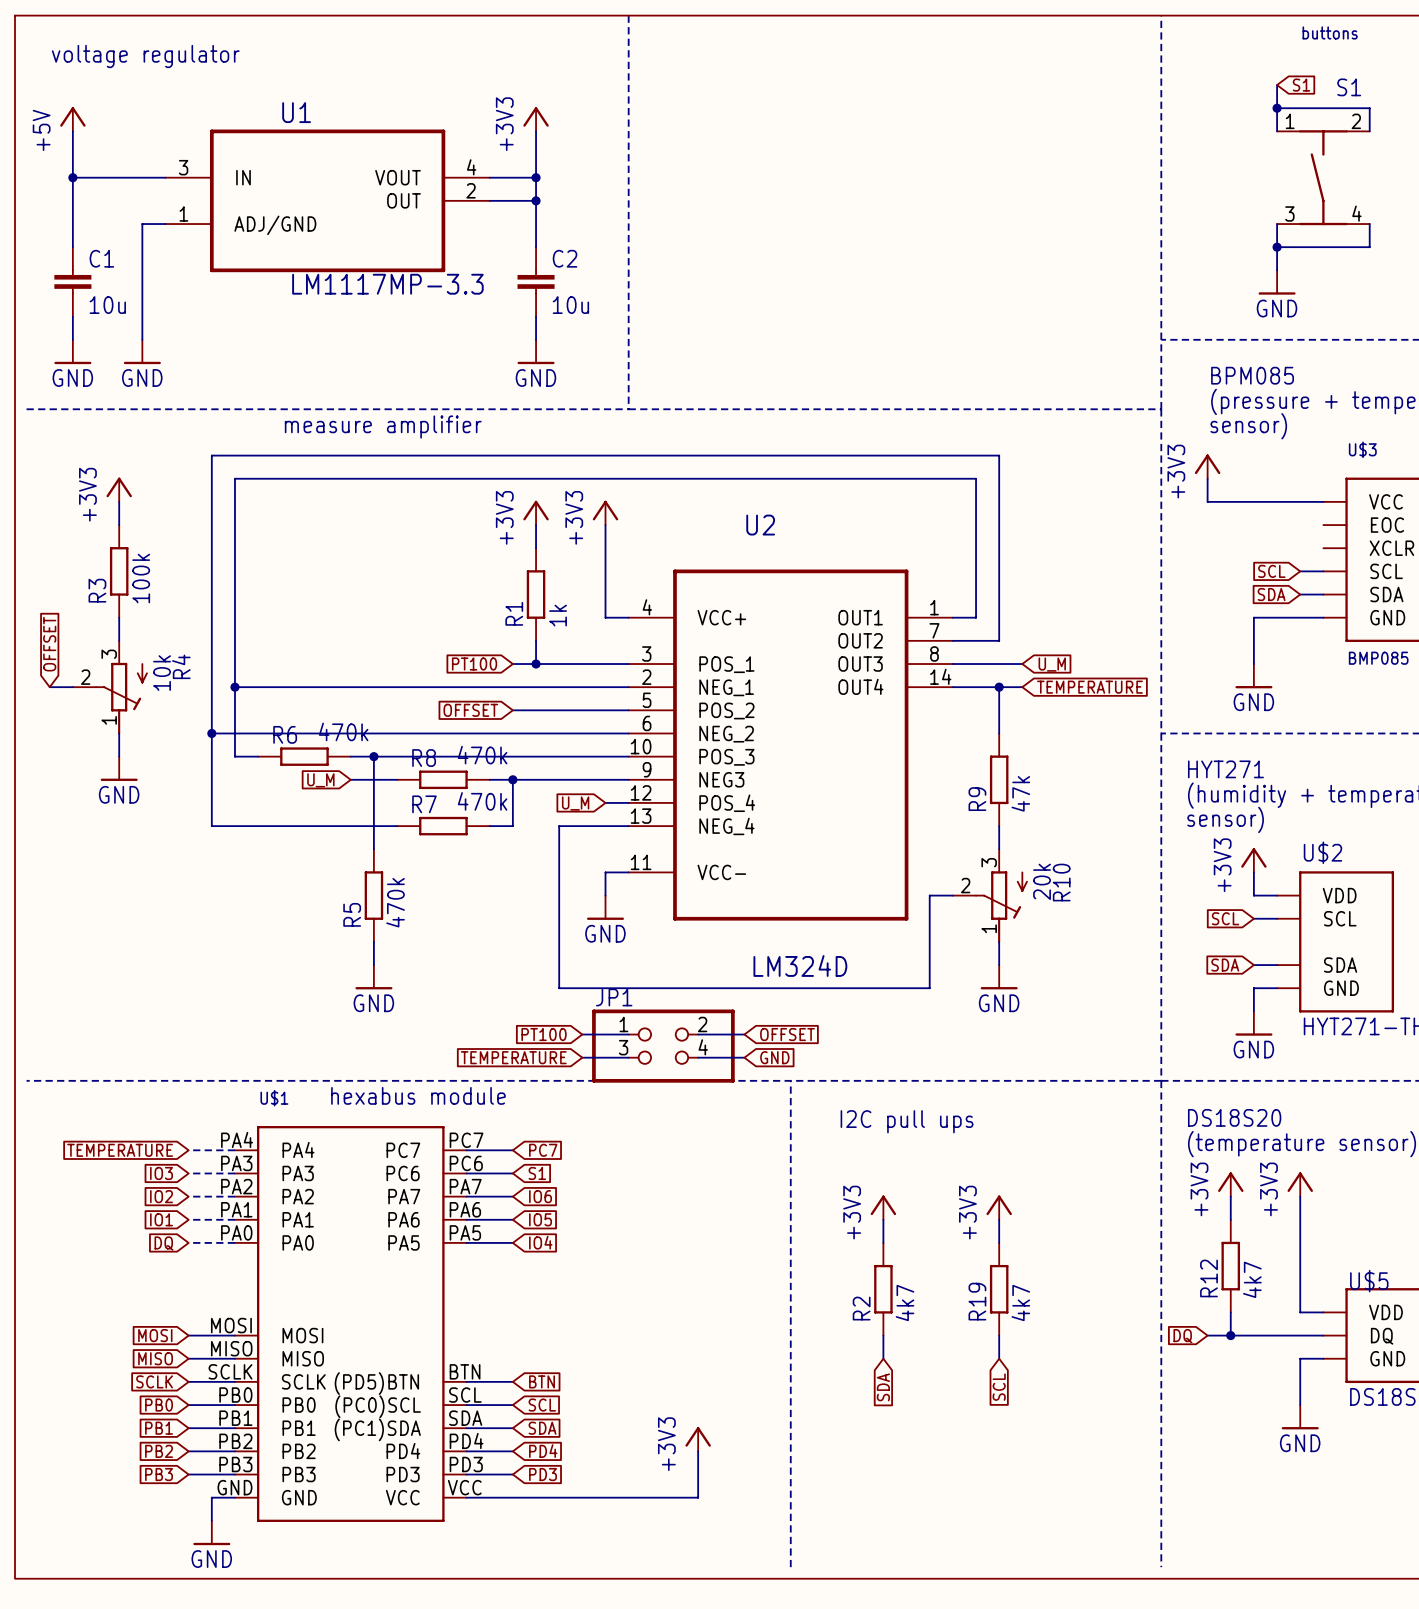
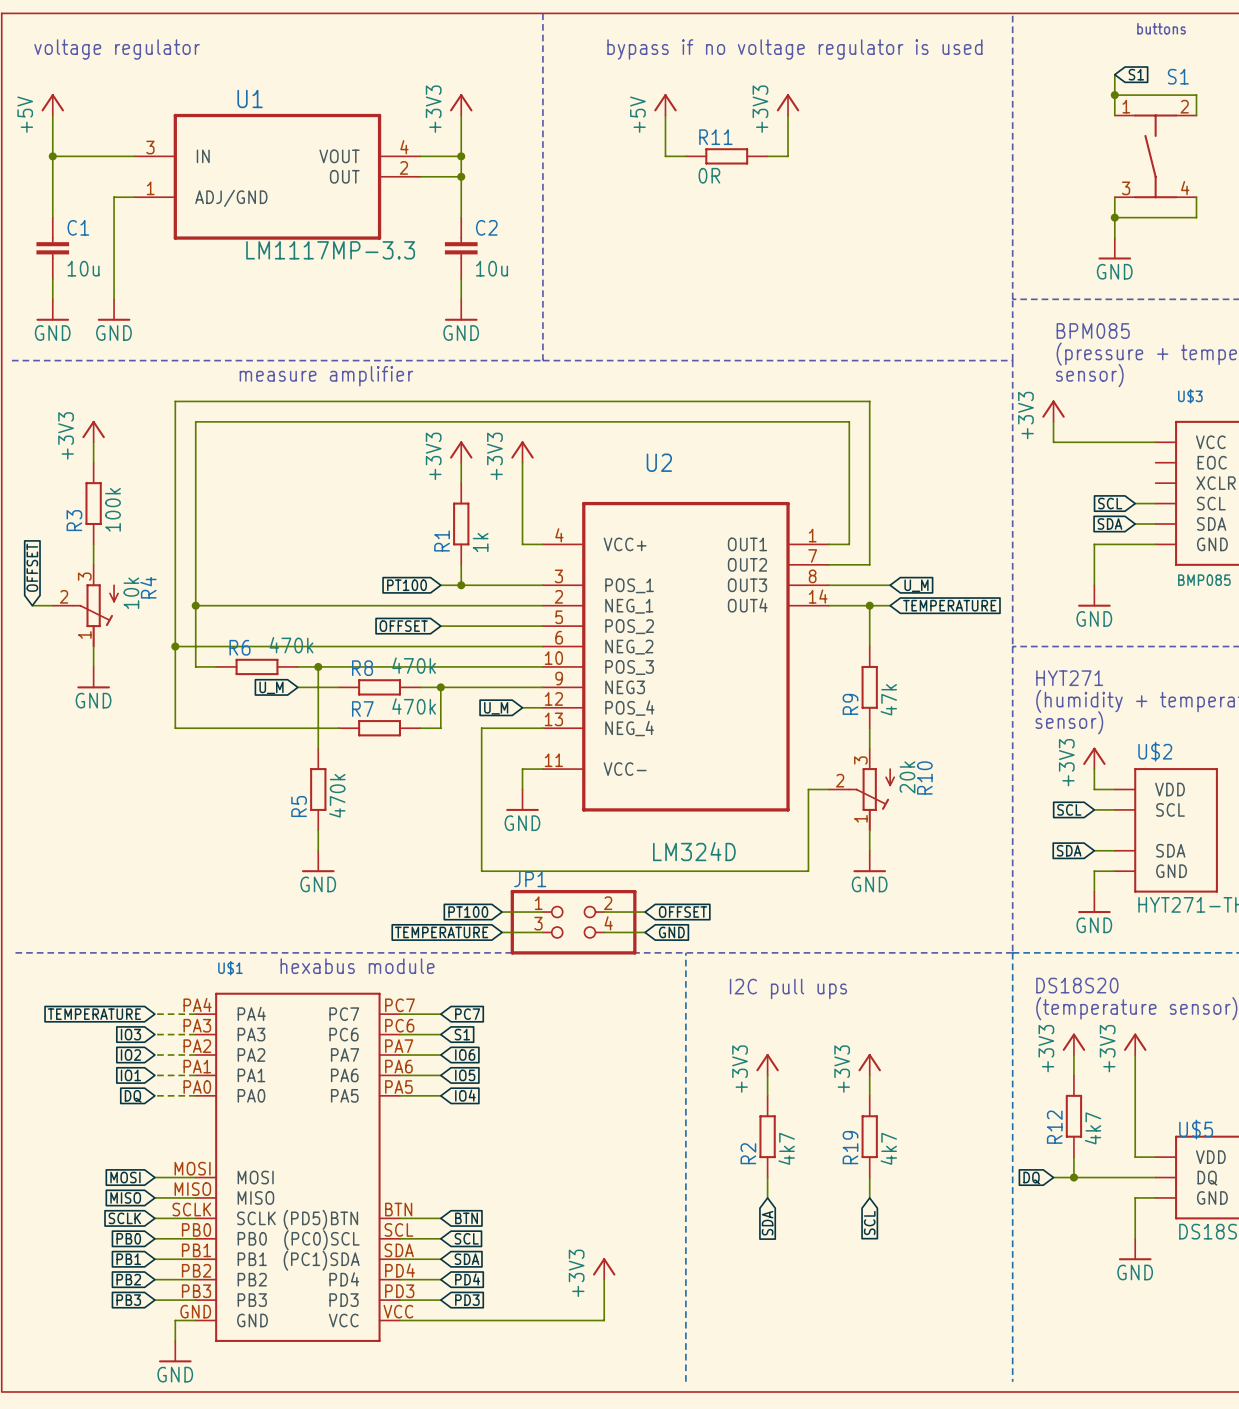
text: none -> bypass if no voltage regulator is used (794, 49)
power symbol: none -> +5V (665, 104)
power symbol: none -> +3V3 (788, 104)
wire: none -> (665, 115) (665, 156) (685, 156)
wire: none -> (788, 115) (788, 156) (767, 156)
R11: none -> 0R (726, 156)

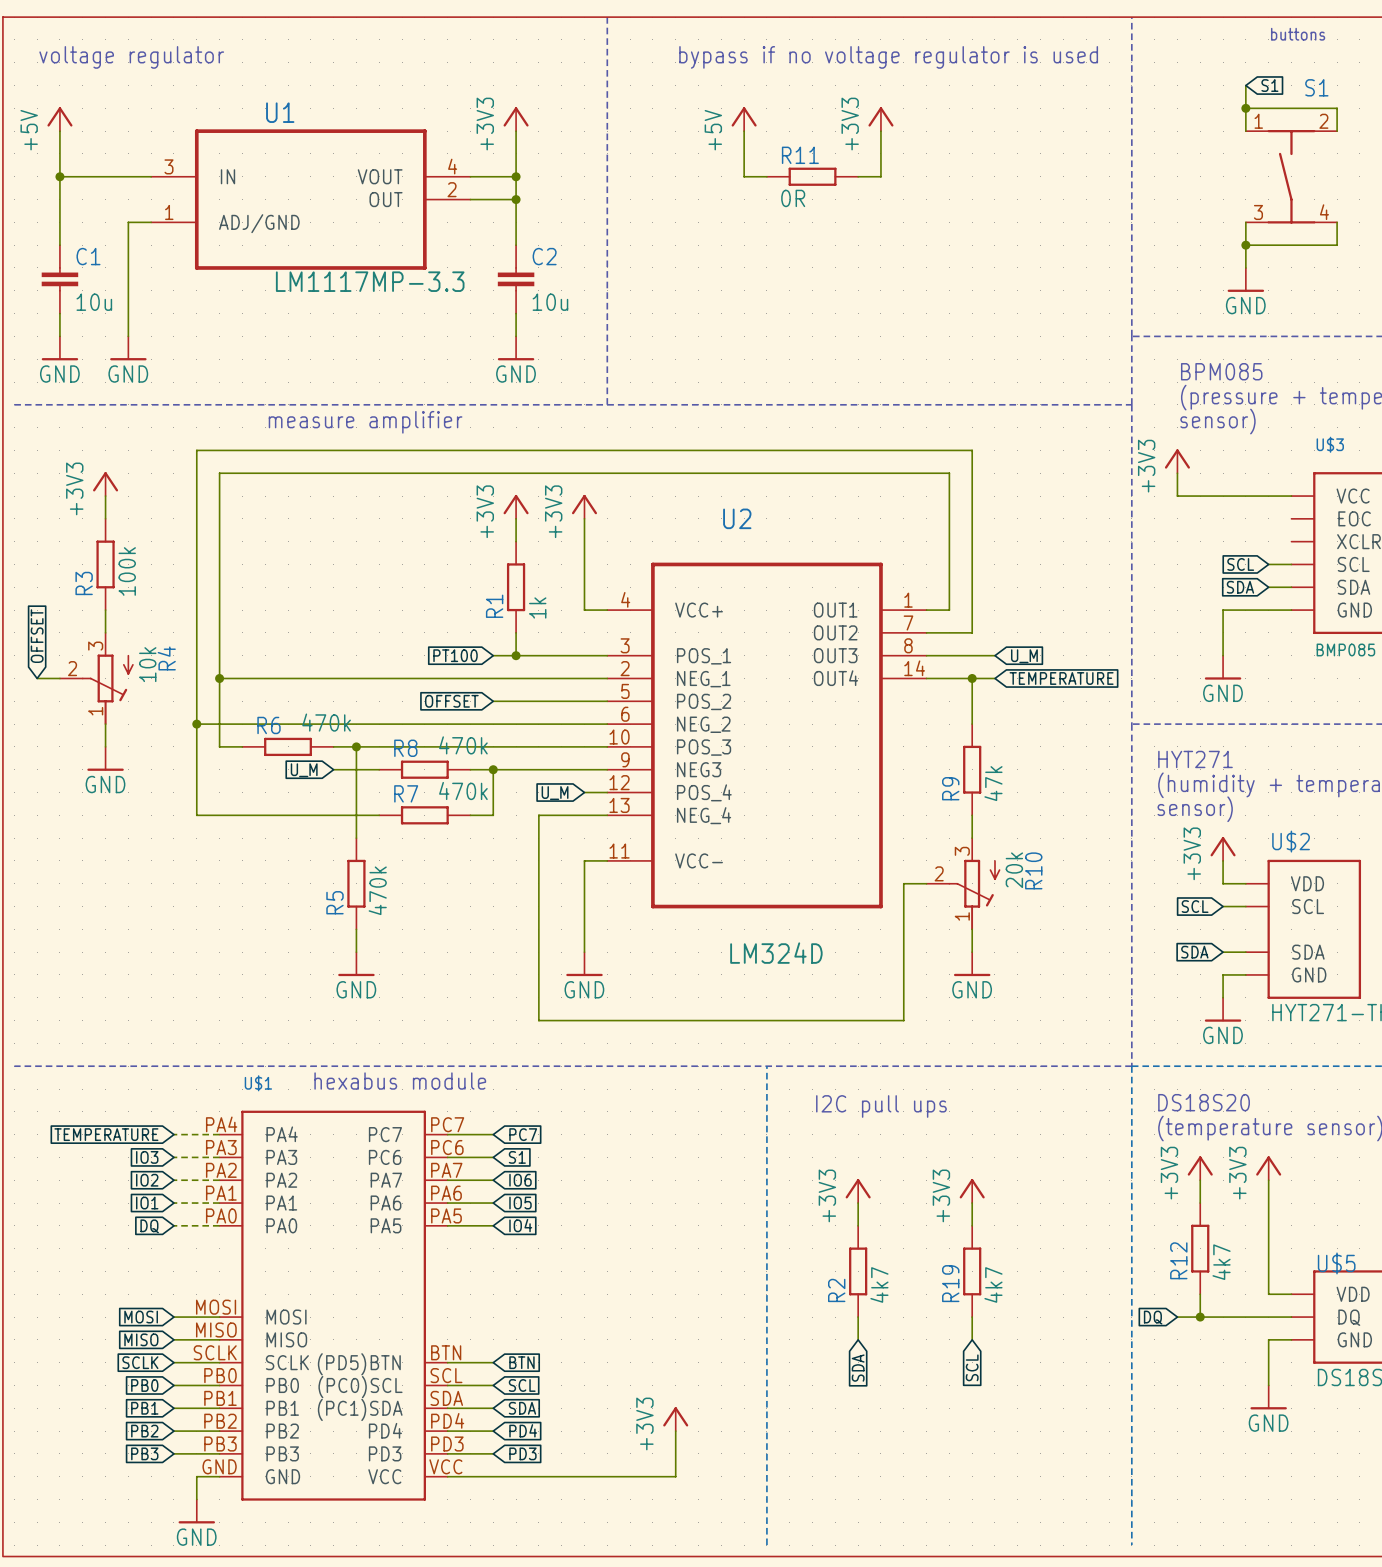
wire: none -> (584, 883) (584, 952)
power symbol position: GND (522, 800) -> GND (584, 964)
wire: (481, 871) (808, 871) -> (721, 1020) (903, 1020) (903, 974)
wire: none -> (538, 974) (538, 1020) (561, 1020)
global label: PT100 (468, 912) -> none
wire: none -> (607, 1020) (675, 1020)
global label: OFFSET (683, 912) -> none
JP1: (573, 922) -> none
global label: TEMPERATURE (441, 932) -> none
wire: (502, 932) (542, 932) -> none
wire: (604, 932) (645, 932) -> none
global label: GND (671, 932) -> none

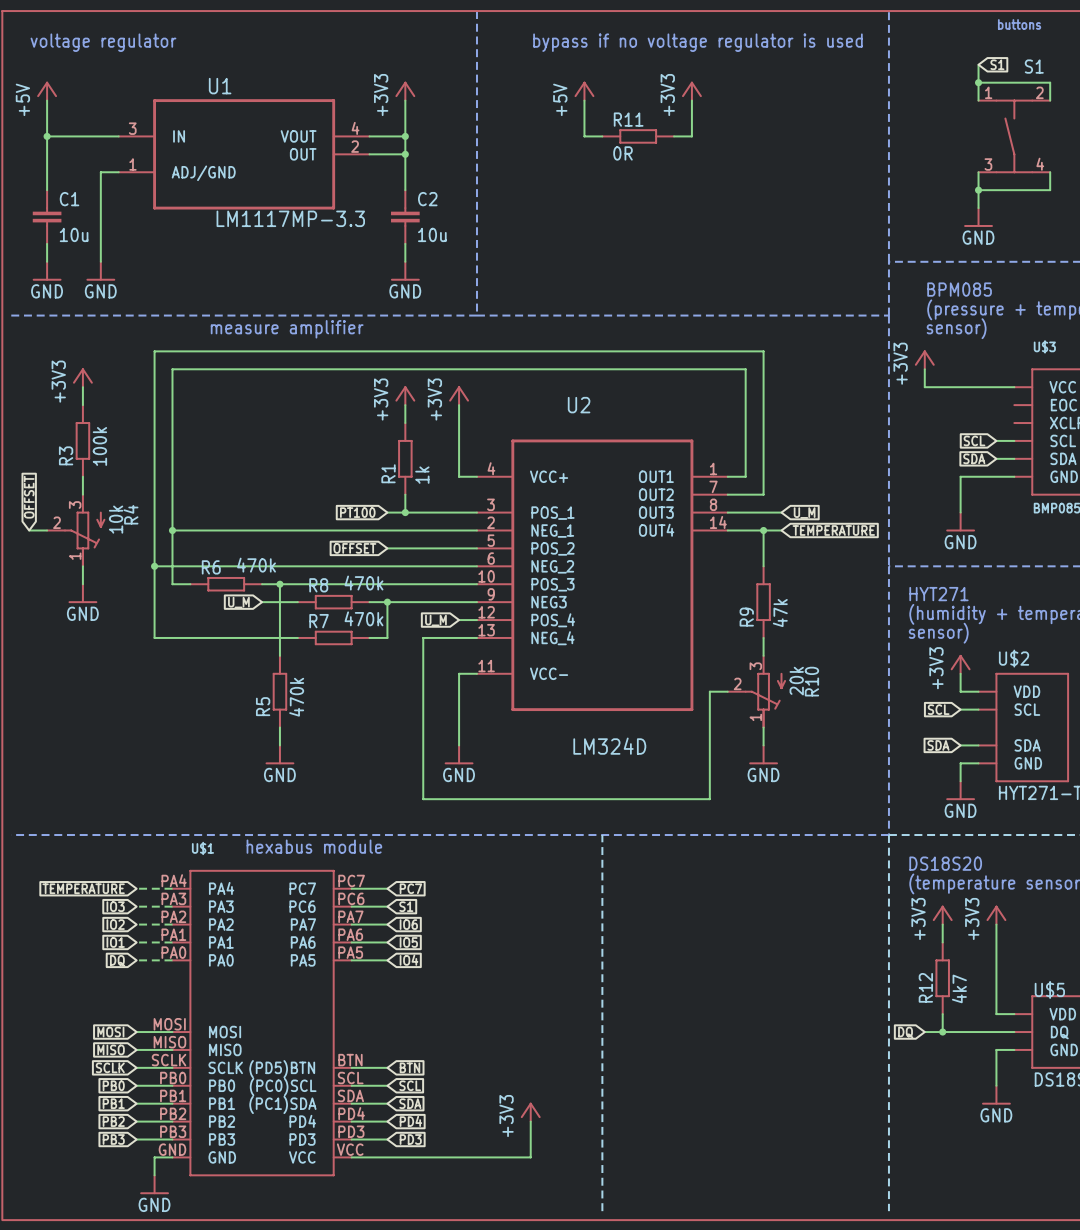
text: I2C pull ups (881, 1106) -> none
power symbol: +3V3 (858, 1191) -> none
power symbol: +3V3 (972, 1191) -> none
wire: (858, 1203) (858, 1225) -> none
wire: (972, 1203) (972, 1225) -> none
R2: 4k7 (858, 1271) -> none
R19: 4k7 (972, 1271) -> none
wire: (858, 1317) (858, 1339) -> none
wire: (972, 1317) (972, 1339) -> none
global label: SCL (972, 1367) -> none
global label: SDA (858, 1368) -> none

